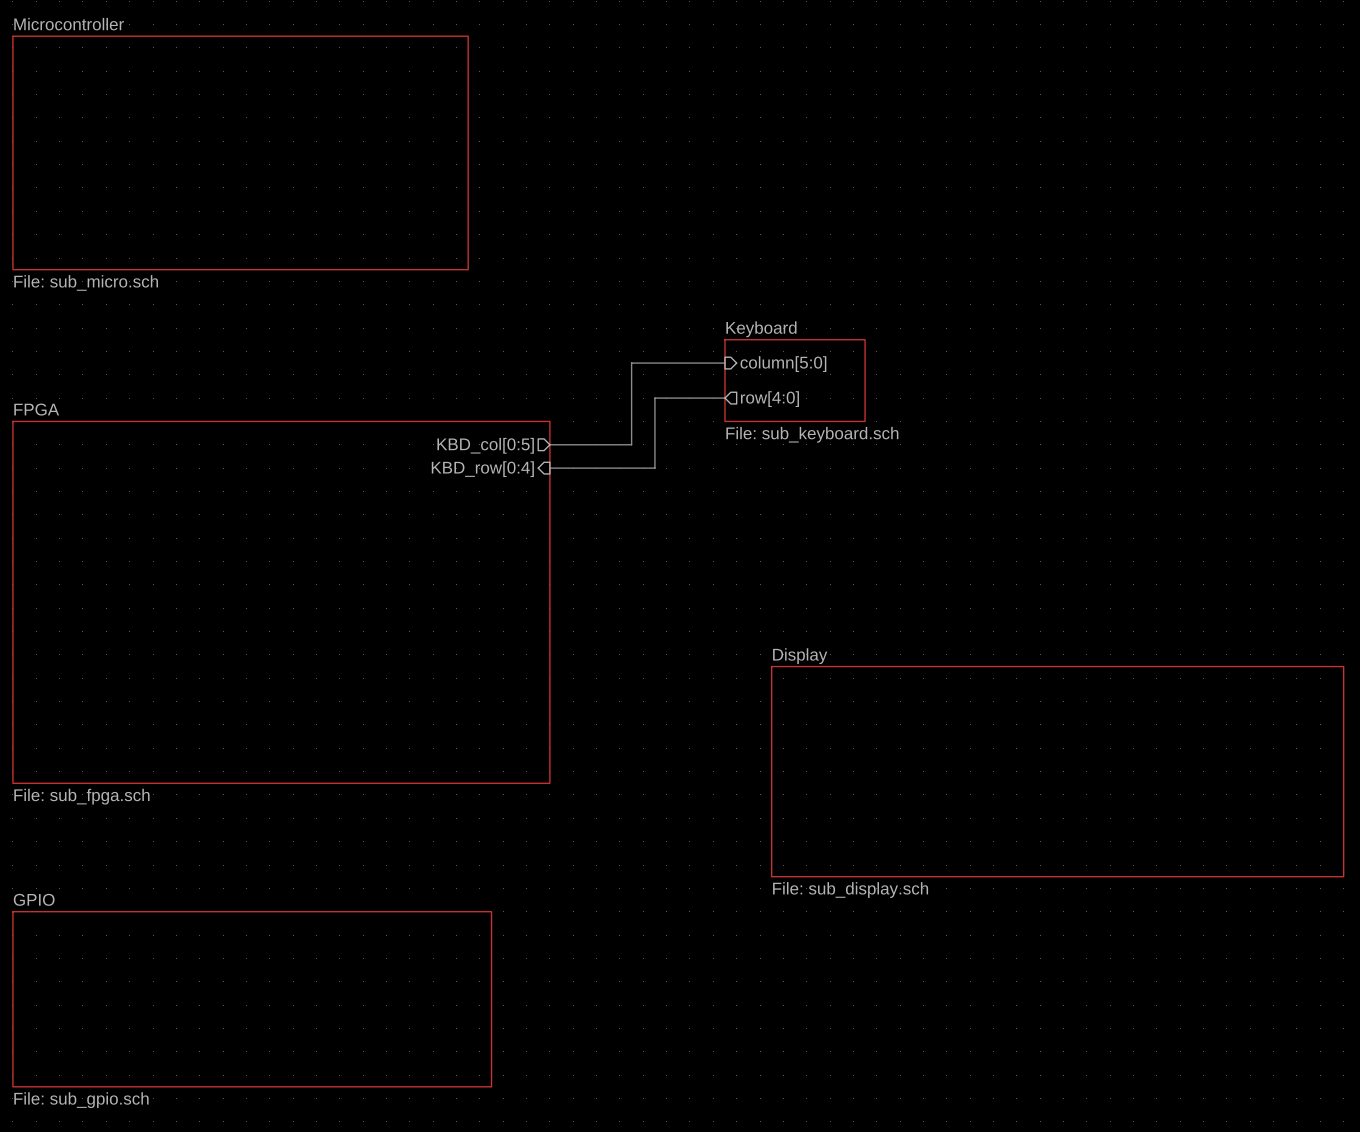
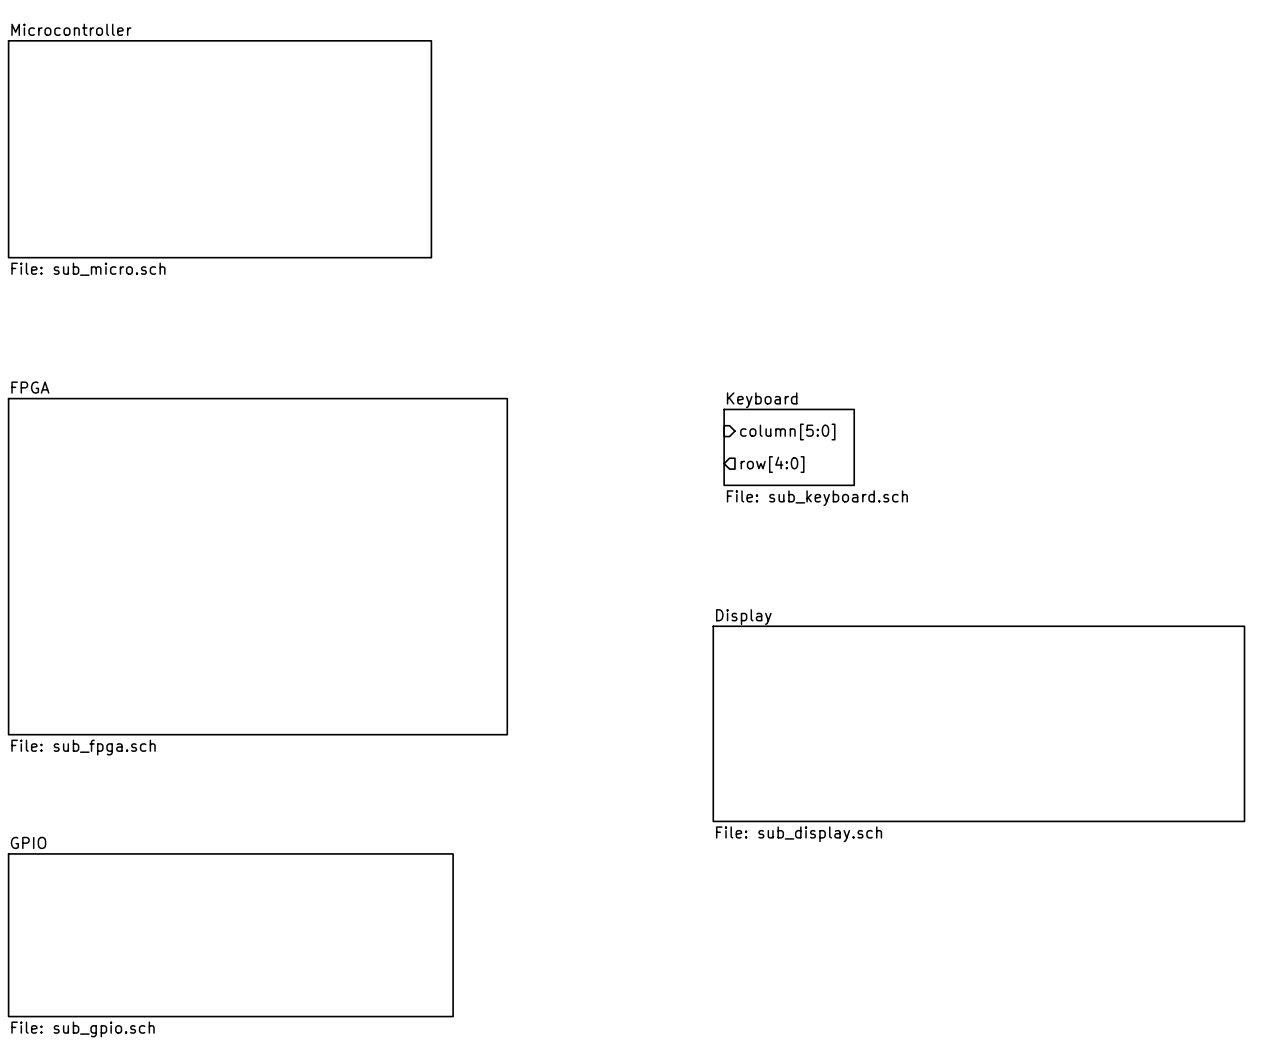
bus: (724, 363) (631, 363) (631, 444) (549, 444) -> none
sheet pin position: column[5:0] (783, 364) -> column[5:0] (787, 432)
sheet Keyboard position: (795, 380) -> (789, 447)
bus: (724, 398) (654, 398) (654, 468) (549, 468) -> none
sheet pin position: row[4:0] (769, 399) -> row[4:0] (772, 464)
sheet pin: KBD_col[0:5] (485, 445) -> none
sheet pin: KBD_row[0:4] (482, 469) -> none

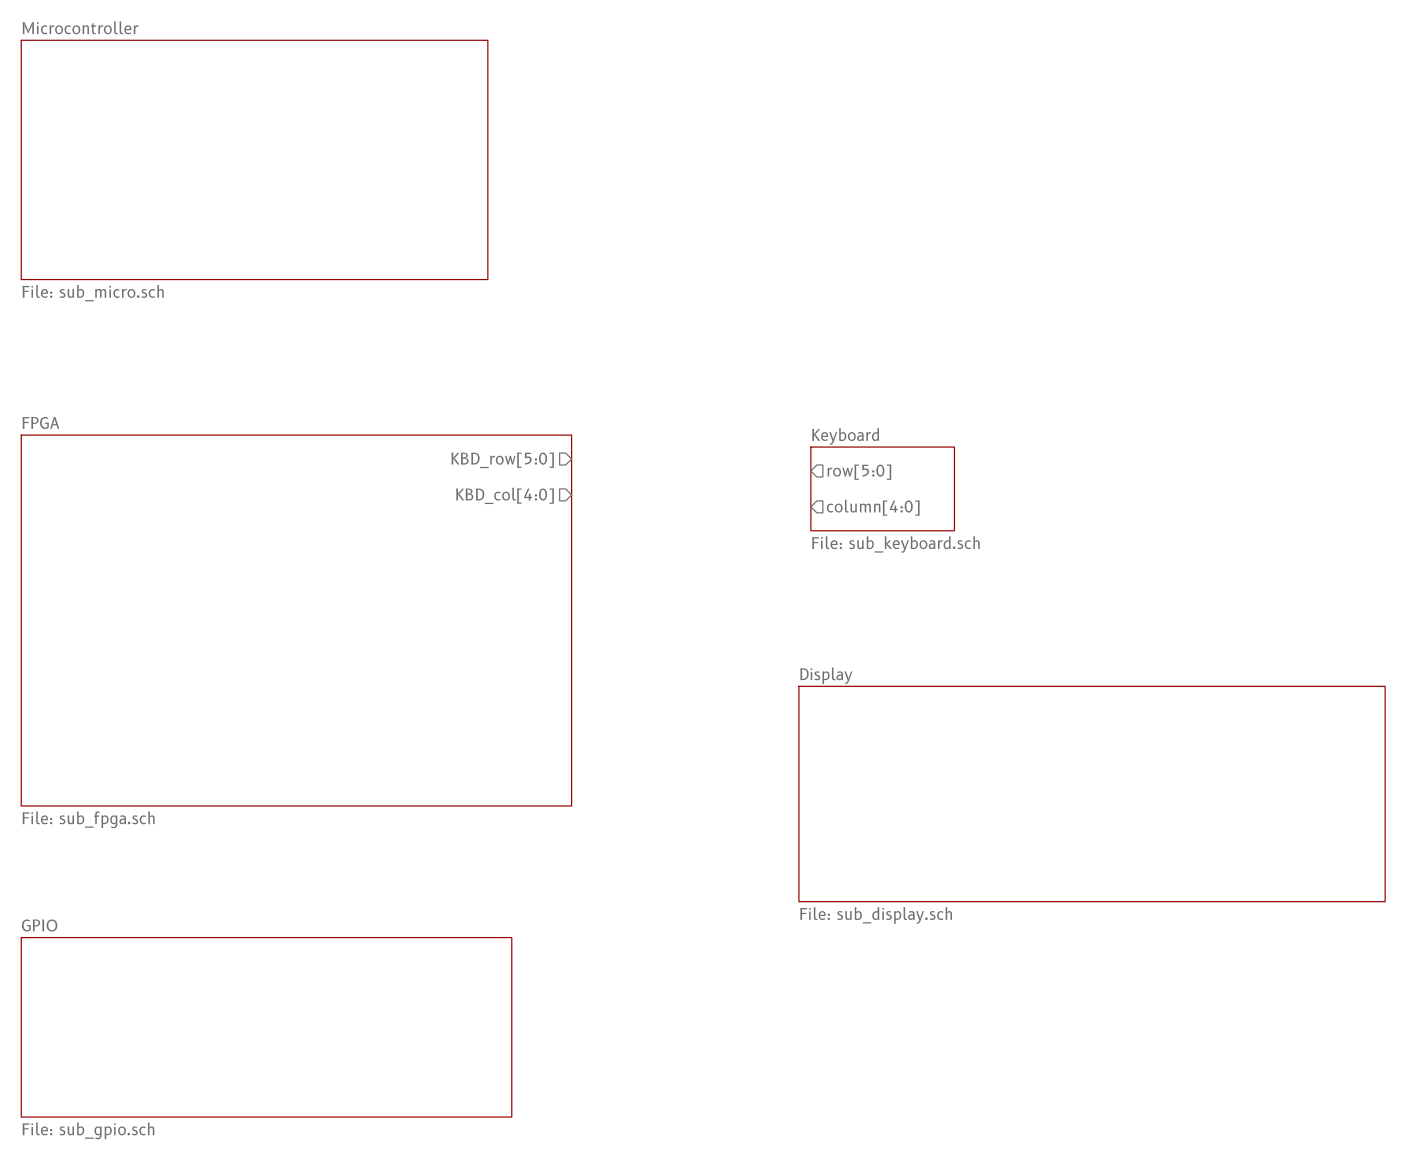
hierarchical label: none -> KBD_row[5:0] (502, 460)
hierarchical label: none -> row[5:0] (859, 472)
sheet pin: column[5:0] (787, 432) -> none
hierarchical label: none -> KBD_col[4:0] (505, 495)
sheet pin: row[4:0] (772, 464) -> none
hierarchical label: none -> column[4:0] (873, 507)

